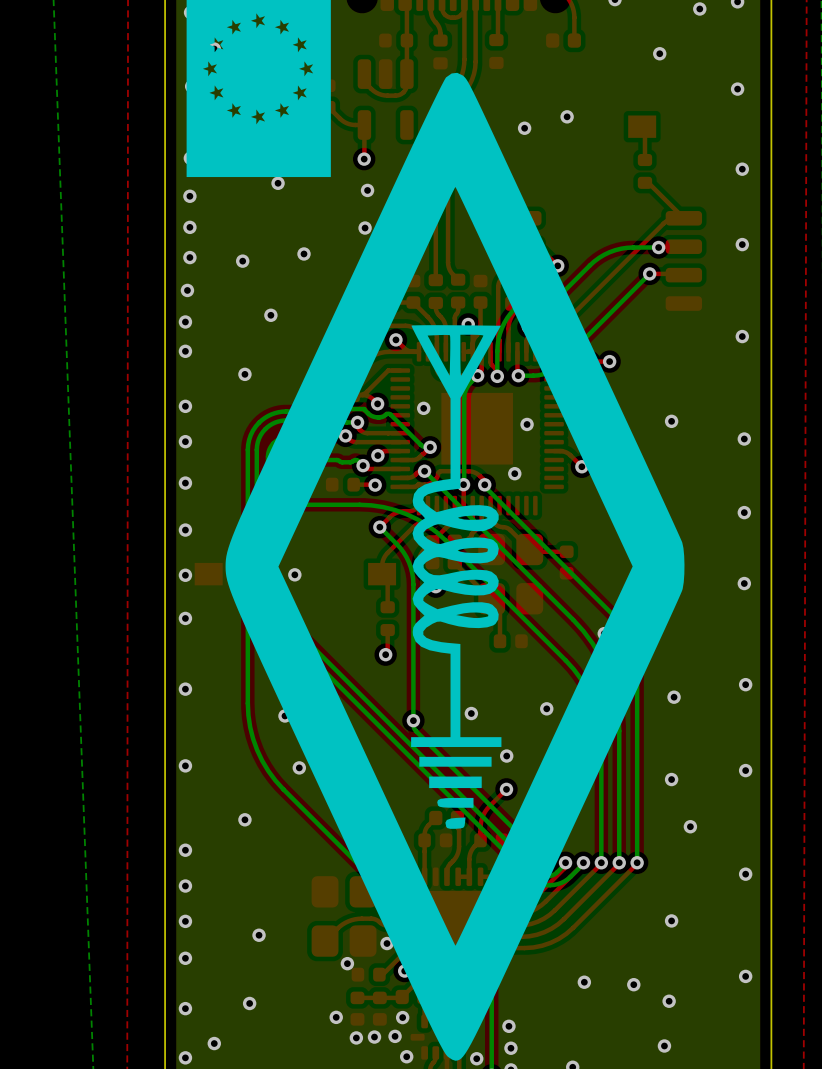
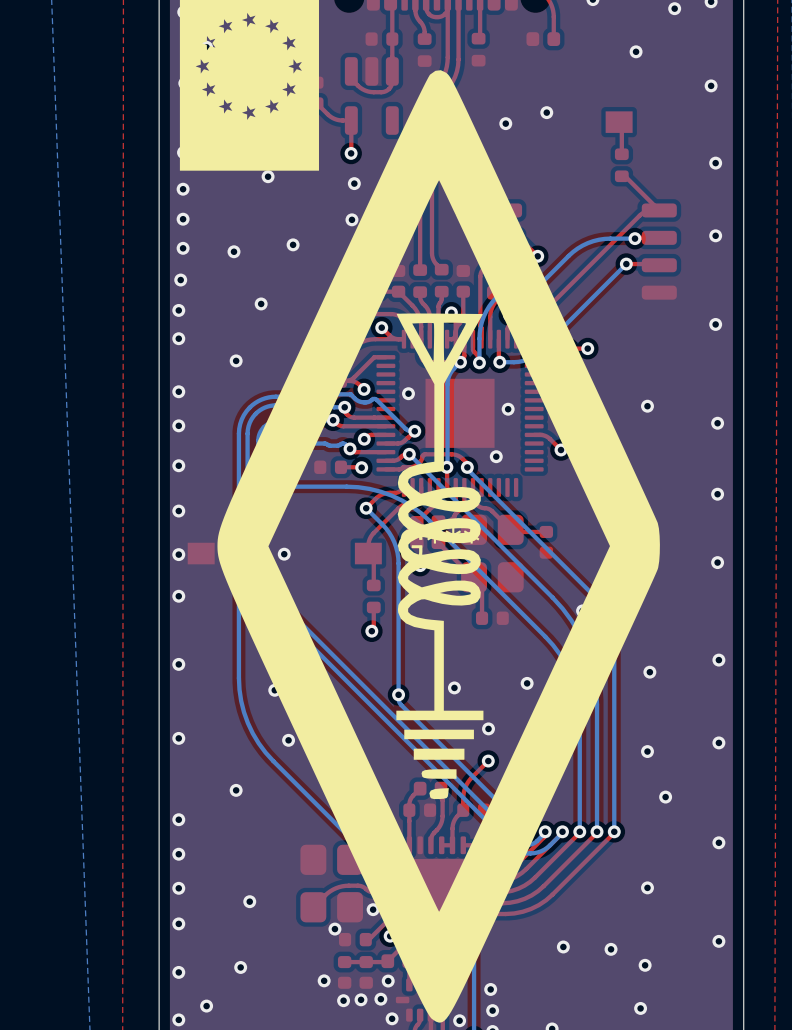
drawing: [225, 72, 685, 1061] -> none
part: none -> (438, 546)

